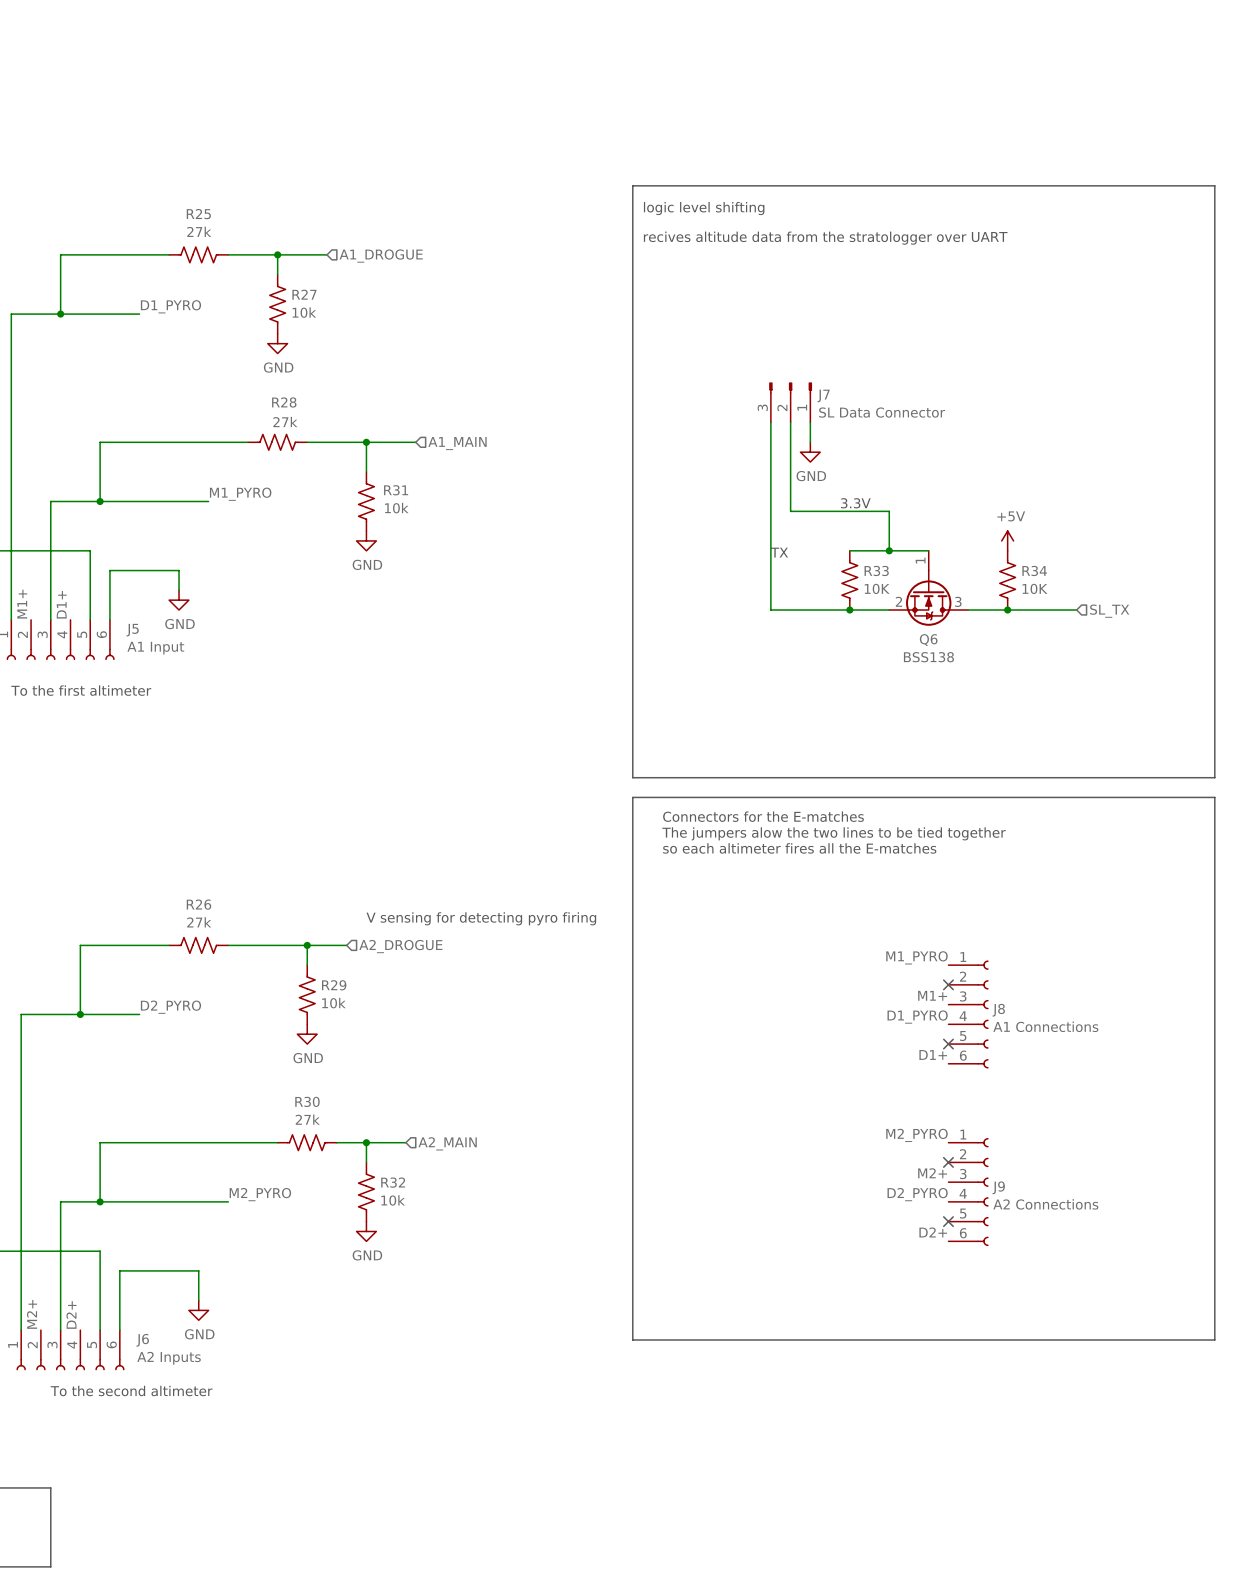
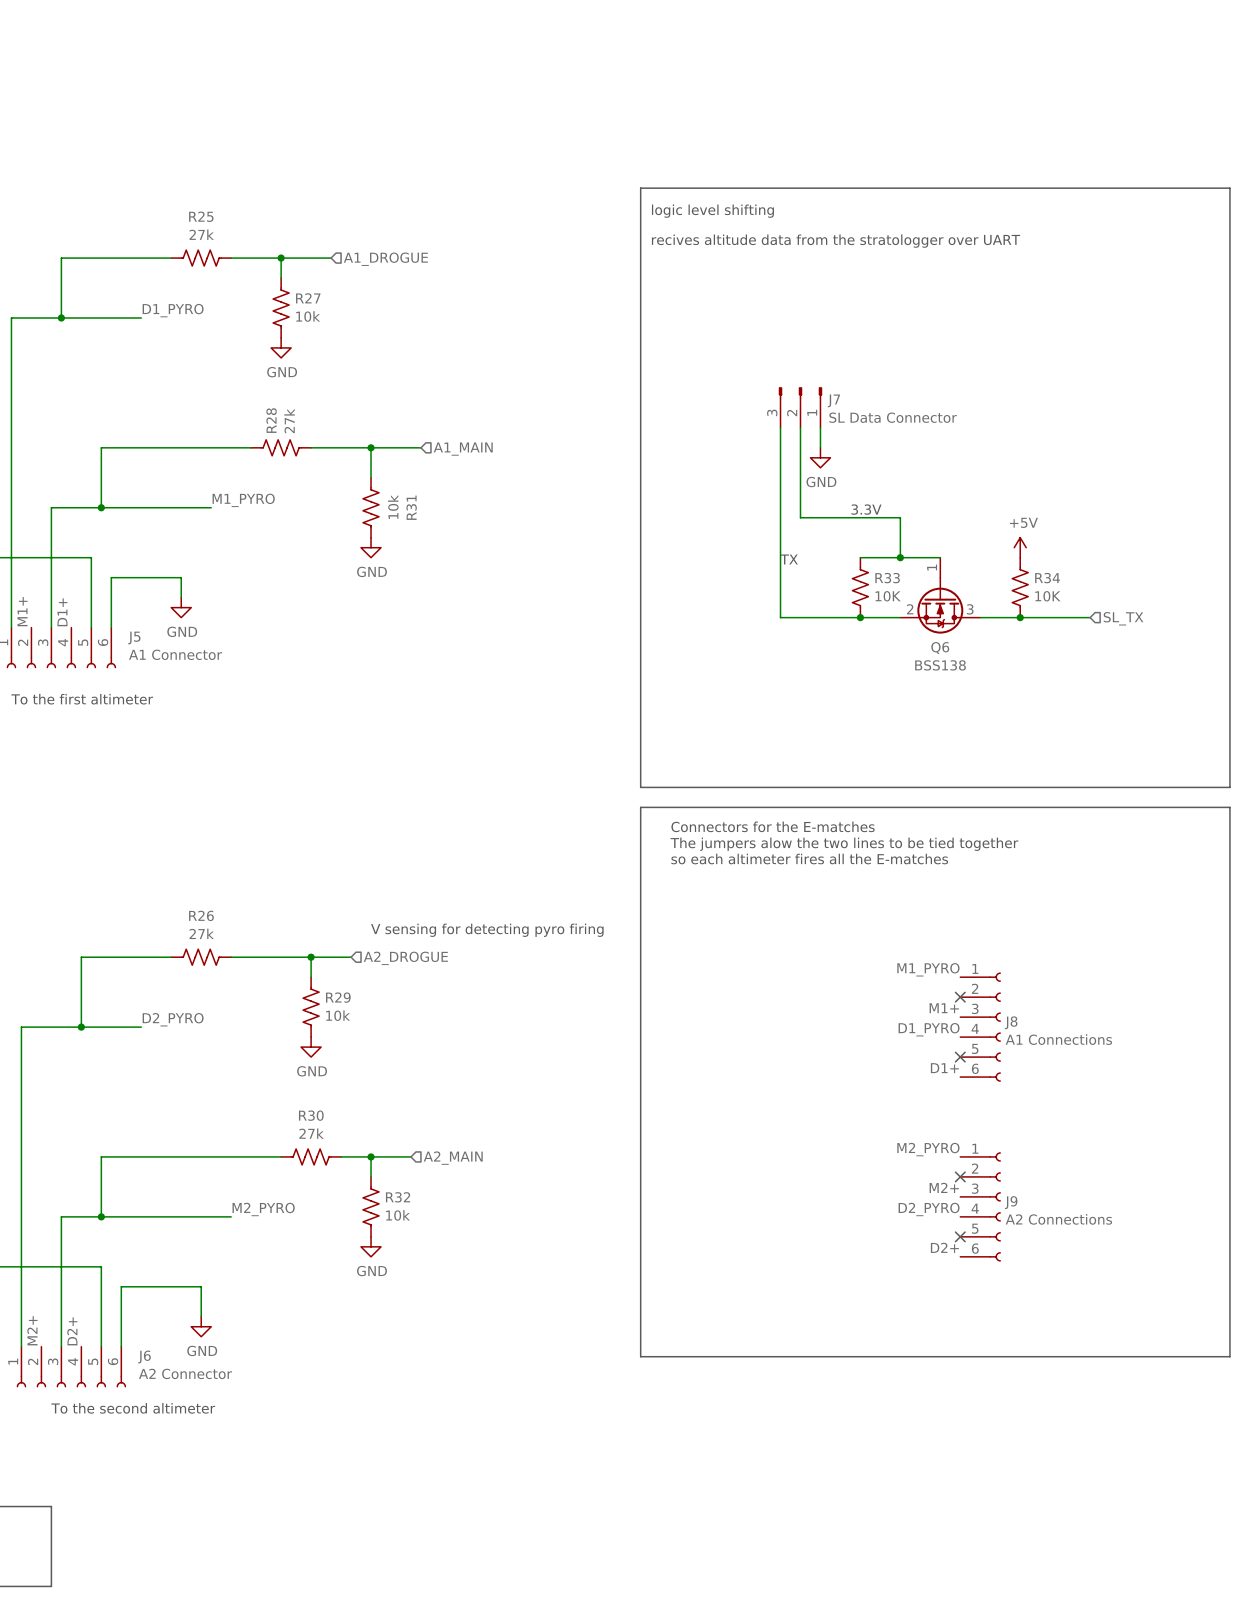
R28 name rotation: 0° (284, 402) -> 90° counterclockwise (271, 420)
R28 value rotation: 0° (285, 422) -> 90° counterclockwise (289, 421)
R31 name rotation: 0° (396, 490) -> 90° counterclockwise (411, 507)
R31 value rotation: 0° (396, 508) -> 90° counterclockwise (393, 507)
J5 value: A1 Input (155, 648) -> A1 Connector (175, 654)
J6 value: A2 Inputs (169, 1358) -> A2 Connector (185, 1373)

